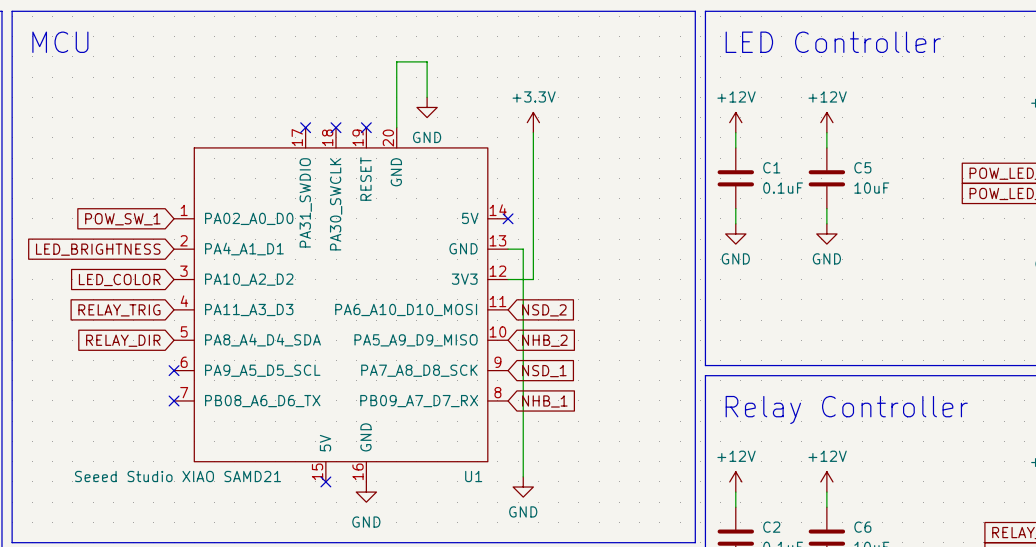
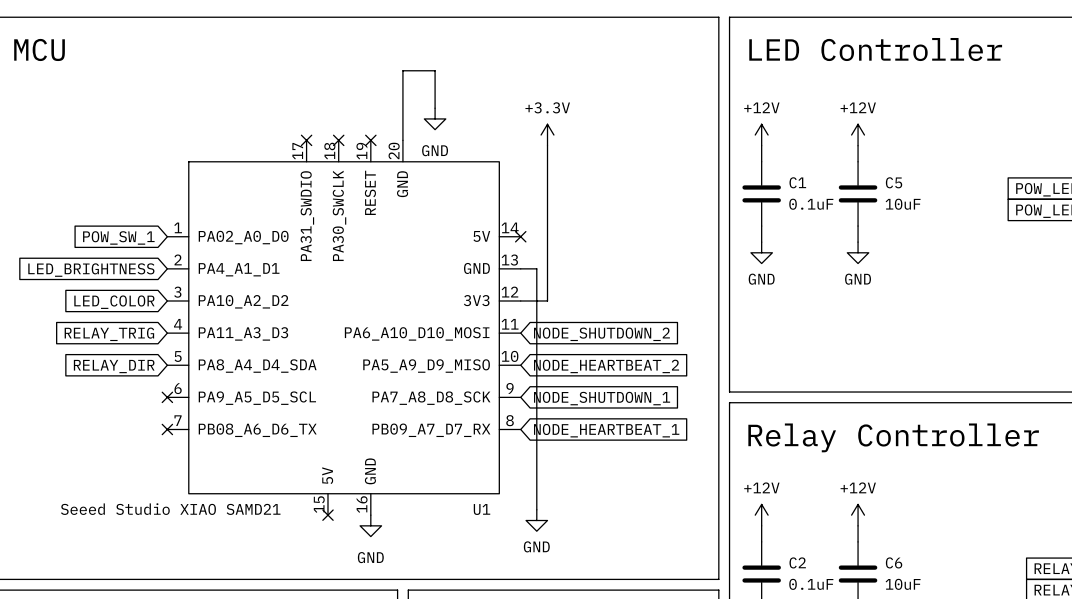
global label: NSD_2 (544, 310) -> NODE_SHUTDOWN_2 (601, 334)
global label: NHB_2 (544, 340) -> NODE_HEARTBEAT_2 (606, 366)
global label: NSD_1 (544, 371) -> NODE_SHUTDOWN_1 (602, 398)
global label: NHB_1 (544, 401) -> NODE_HEARTBEAT_1 (606, 430)

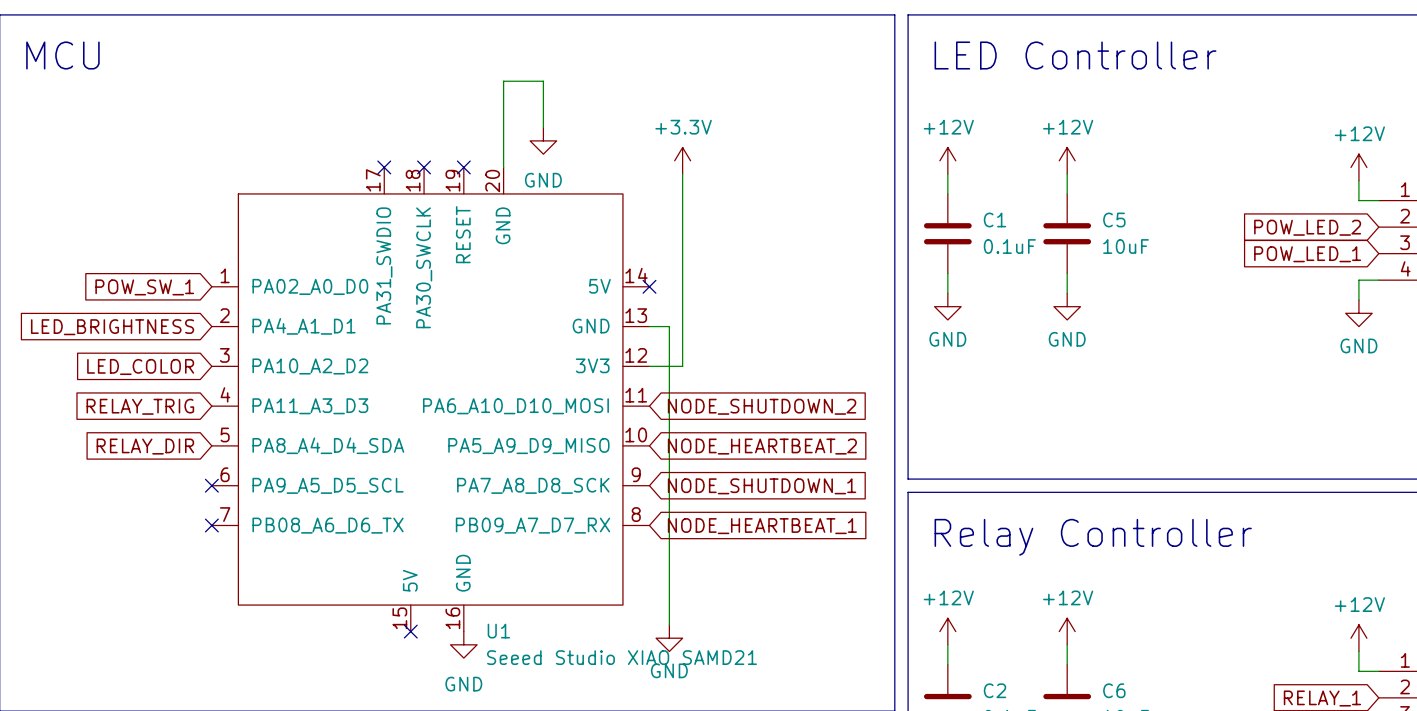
U1 value position: Seeed Studio XIAO SAMD21 (170, 509) -> Seeed Studio XIAO SAMD21 (622, 657)
U1 name position: U1 (482, 509) -> U1 (498, 631)

